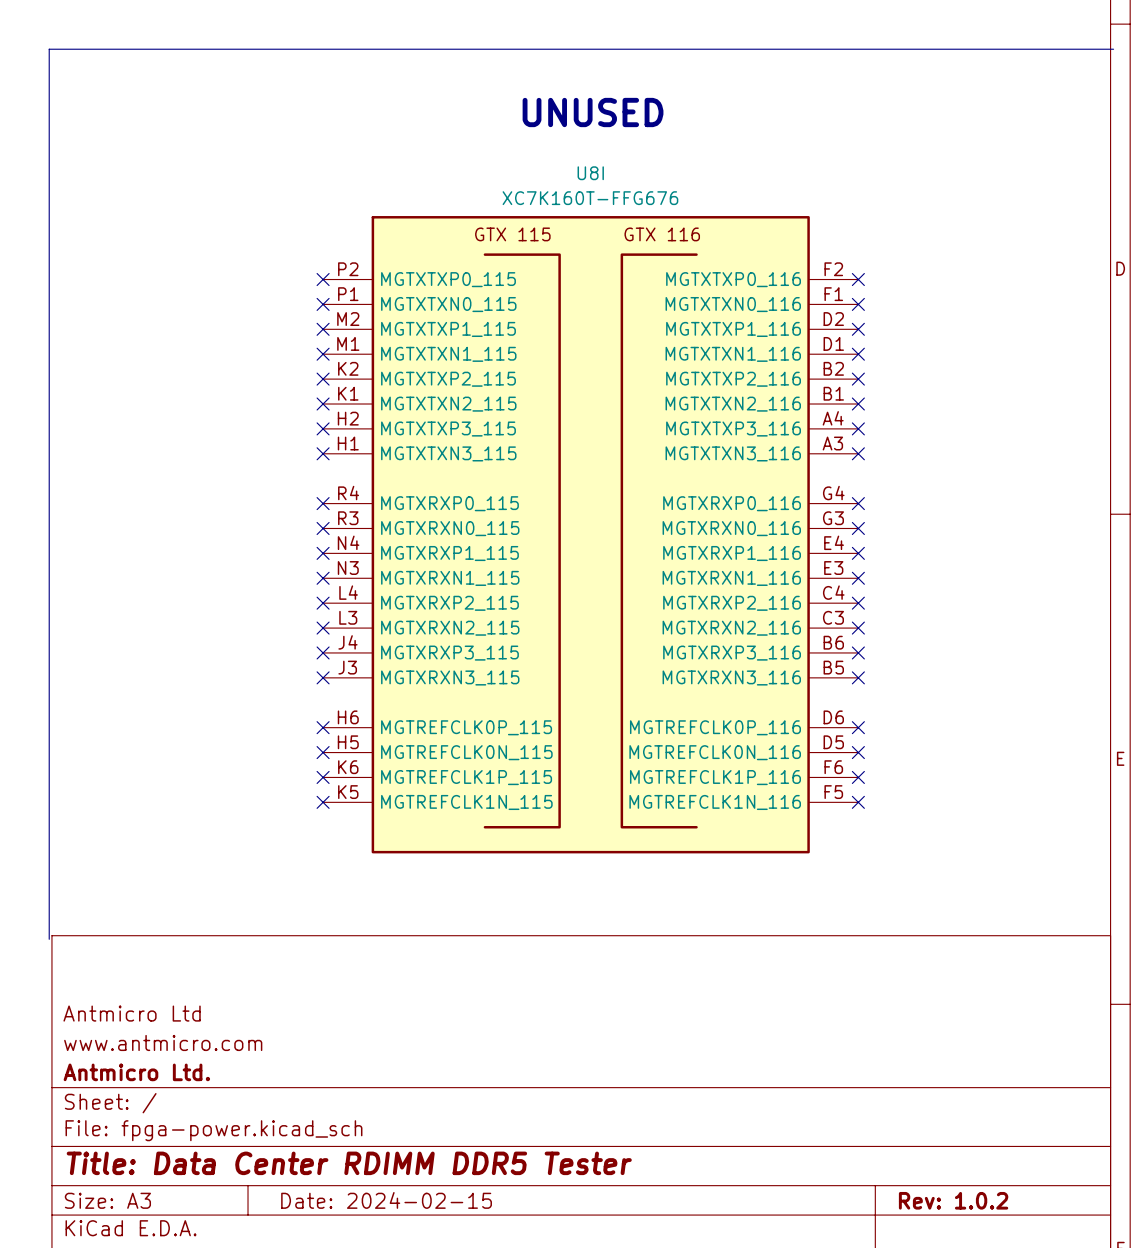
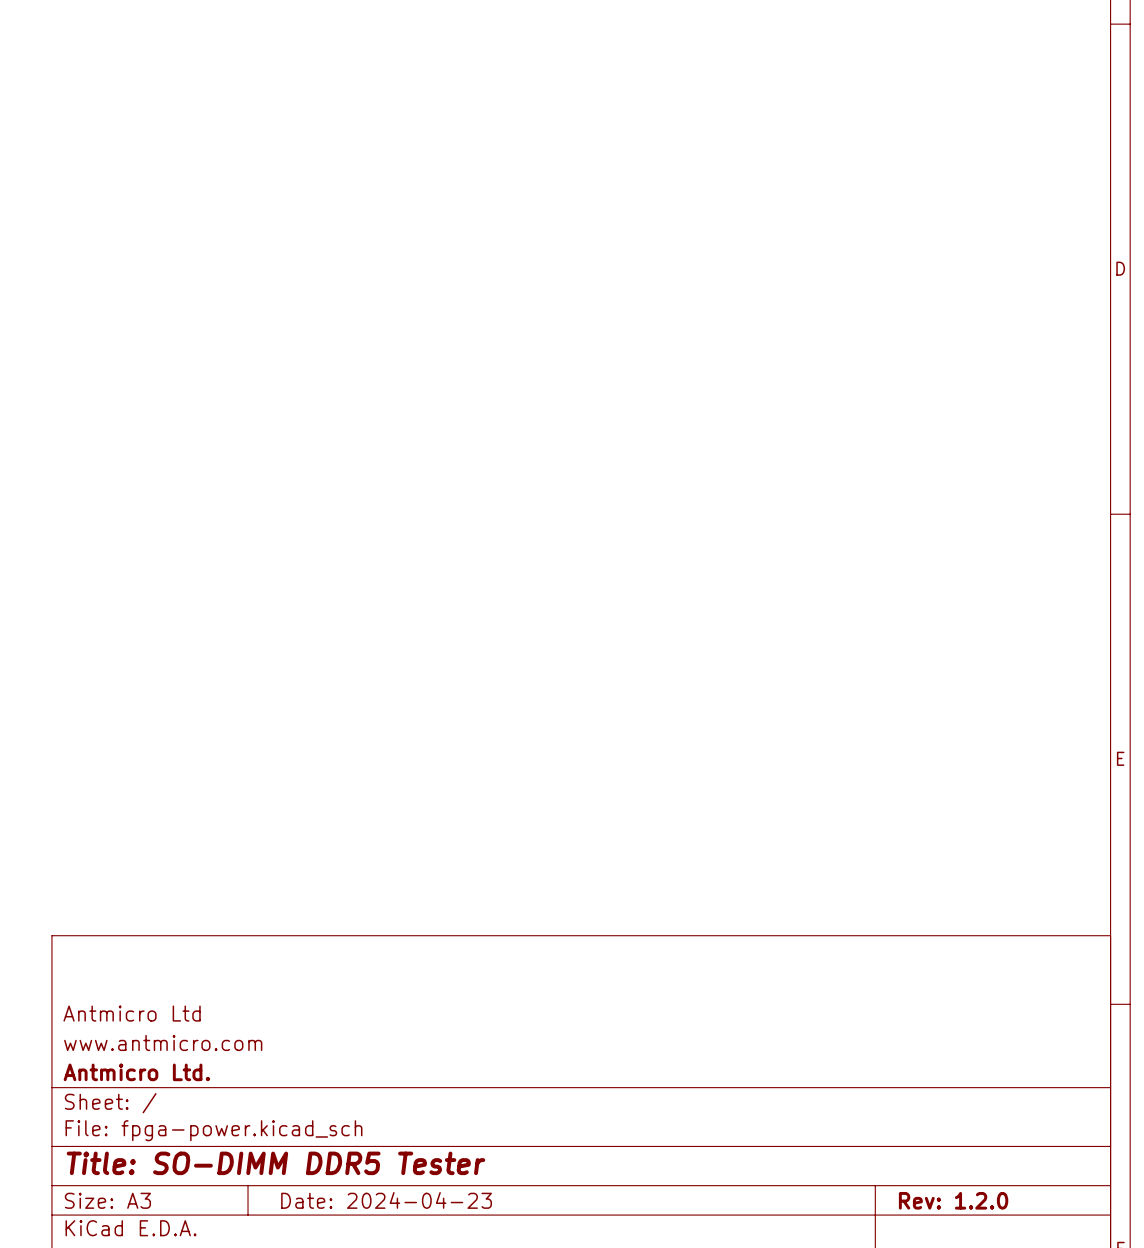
line: (1113, 49) (49, 49) (49, 939) -> none
text: UNUSED (593, 112) -> none
no-connect mark: (323, 279) -> none
no-connect mark: (858, 279) -> none
no-connect mark: (323, 304) -> none
no-connect mark: (858, 304) -> none
no-connect mark: (323, 329) -> none
no-connect mark: (858, 329) -> none
no-connect mark: (323, 354) -> none
no-connect mark: (858, 354) -> none
no-connect mark: (323, 379) -> none
no-connect mark: (858, 379) -> none
no-connect mark: (323, 404) -> none
no-connect mark: (858, 404) -> none
no-connect mark: (323, 428) -> none
no-connect mark: (858, 428) -> none
no-connect mark: (323, 453) -> none
no-connect mark: (858, 453) -> none
no-connect mark: (323, 503) -> none
no-connect mark: (858, 503) -> none
no-connect mark: (323, 528) -> none
no-connect mark: (858, 528) -> none
U8I: XC7K160T-FFG676 (590, 534) -> none
no-connect mark: (323, 553) -> none
no-connect mark: (858, 553) -> none
no-connect mark: (323, 578) -> none
no-connect mark: (858, 578) -> none
no-connect mark: (323, 603) -> none
no-connect mark: (858, 603) -> none
no-connect mark: (323, 628) -> none
no-connect mark: (858, 628) -> none
no-connect mark: (323, 652) -> none
no-connect mark: (858, 652) -> none
no-connect mark: (323, 677) -> none
no-connect mark: (858, 677) -> none
no-connect mark: (323, 727) -> none
no-connect mark: (858, 727) -> none
no-connect mark: (323, 752) -> none
no-connect mark: (858, 752) -> none
no-connect mark: (323, 777) -> none
no-connect mark: (858, 777) -> none
no-connect mark: (323, 802) -> none
no-connect mark: (858, 802) -> none
title block: Title: Data Center RDIMM DDR5 Tester (349, 1163) -> Title: SO-DIMM DDR5 Tester (275, 1163)
title block: Date: 2024-02-15 (386, 1200) -> Date: 2024-04-23 (386, 1200)
title block: Rev: 1.0.2 (953, 1200) -> Rev: 1.2.0 (953, 1200)

